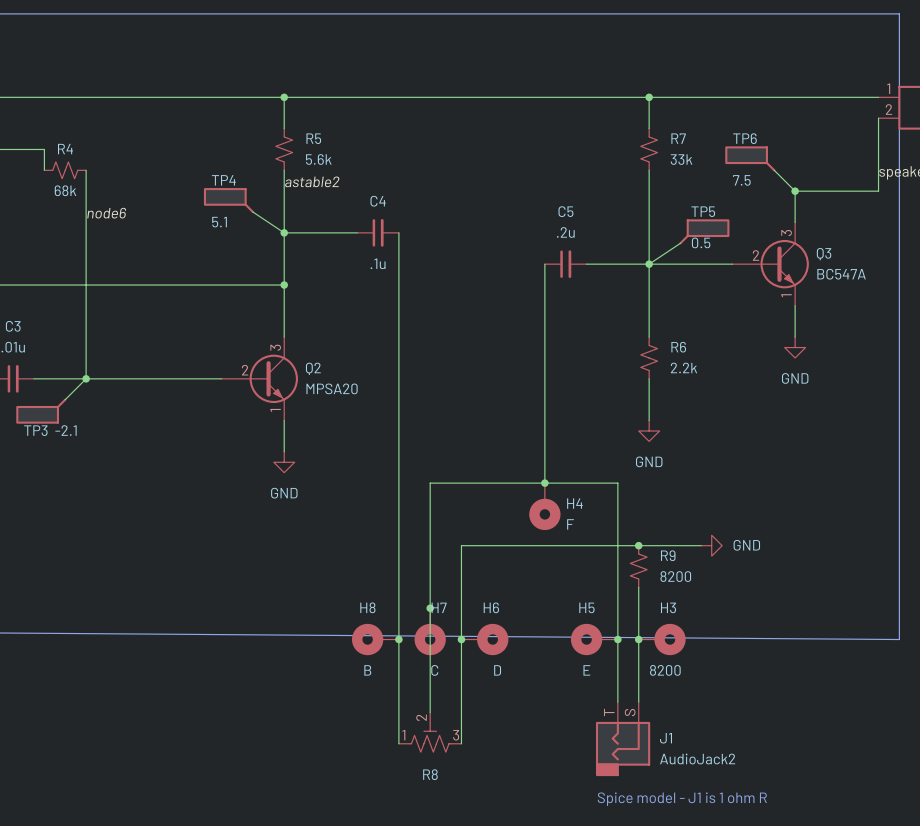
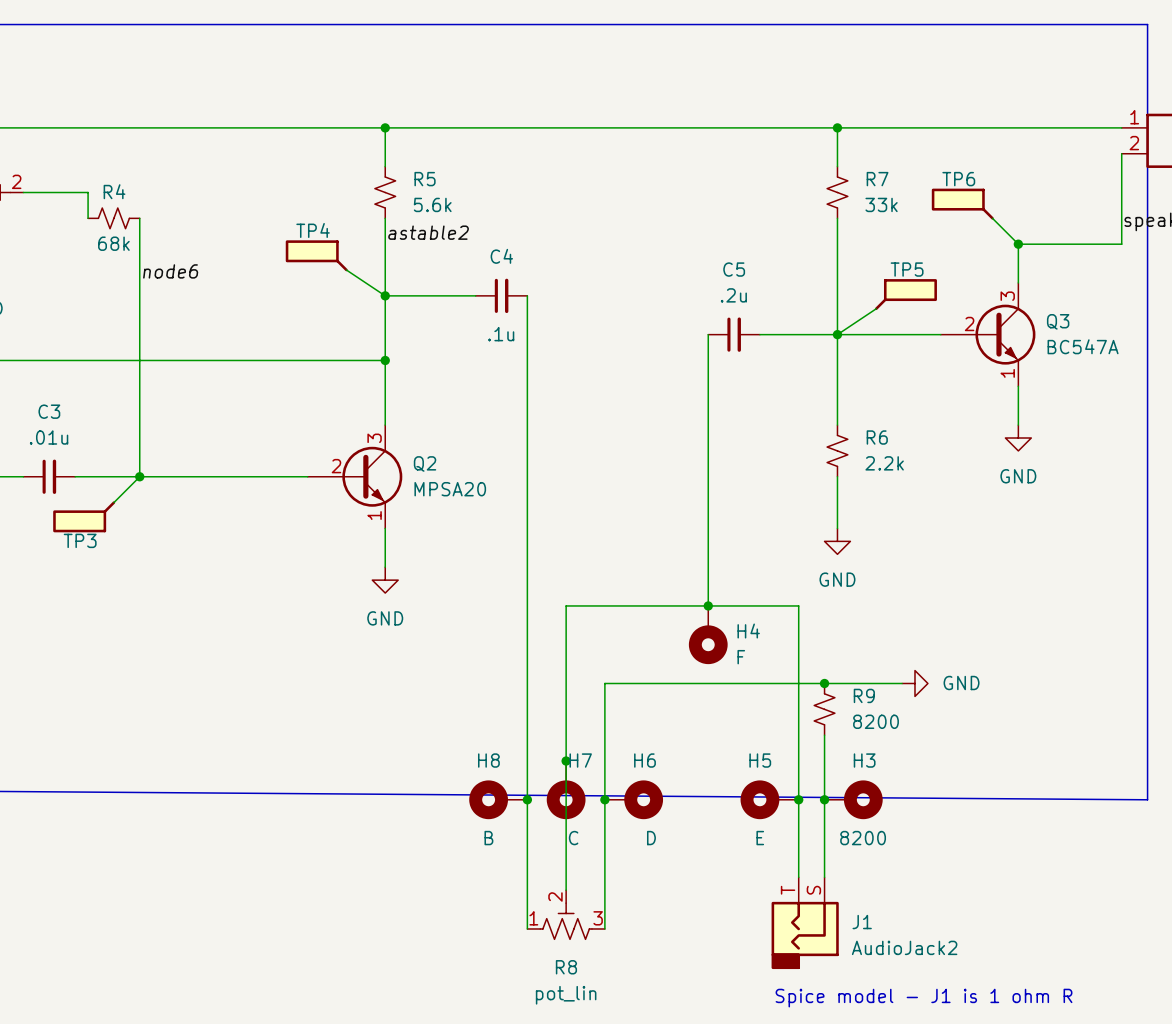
TP6 value: 7.5 (741, 180) -> none
TP4 value: 5.1 (219, 222) -> none
TP5 value: 0.5 (701, 242) -> none
TP3 value: -2.1 (66, 430) -> none
R8 value: none -> pot_lin (566, 995)

